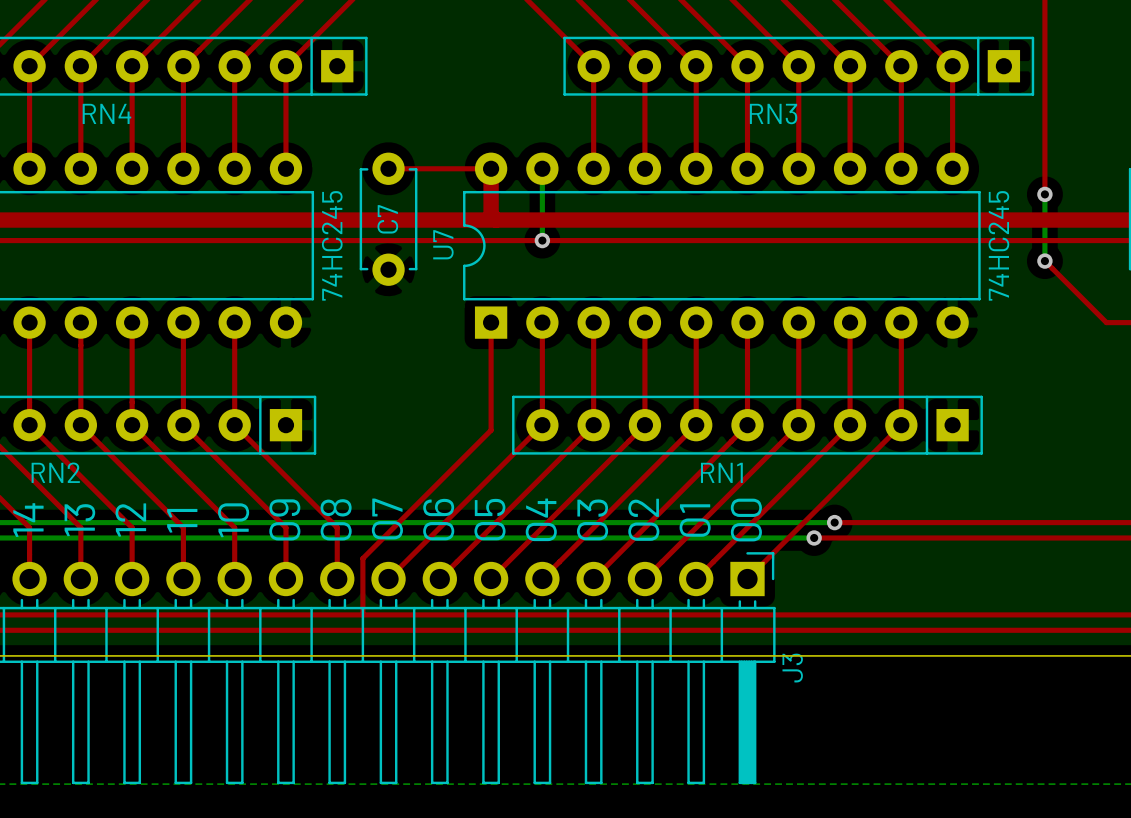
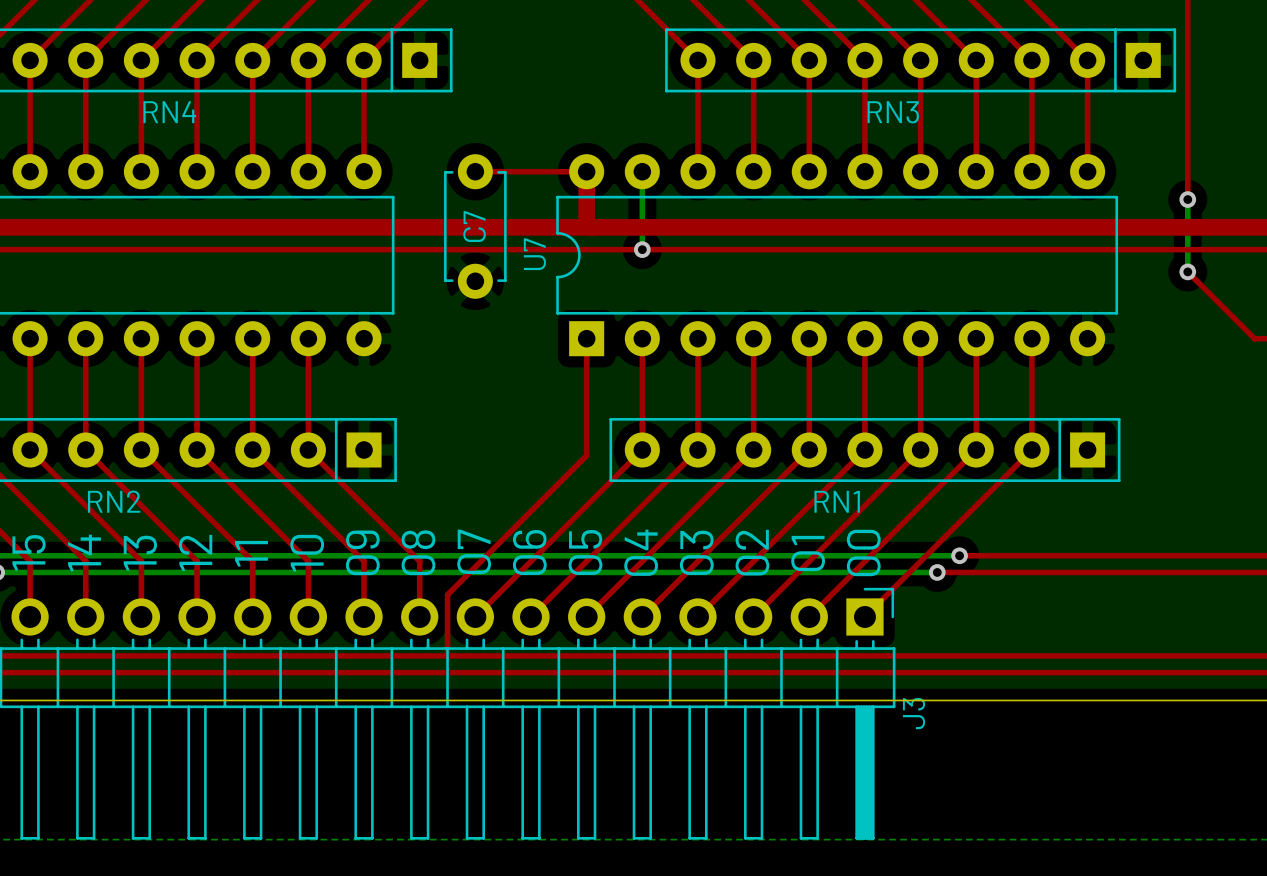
part value: 74HC245 (332, 245) -> none
U7 value: 74HC245 (998, 245) -> none

